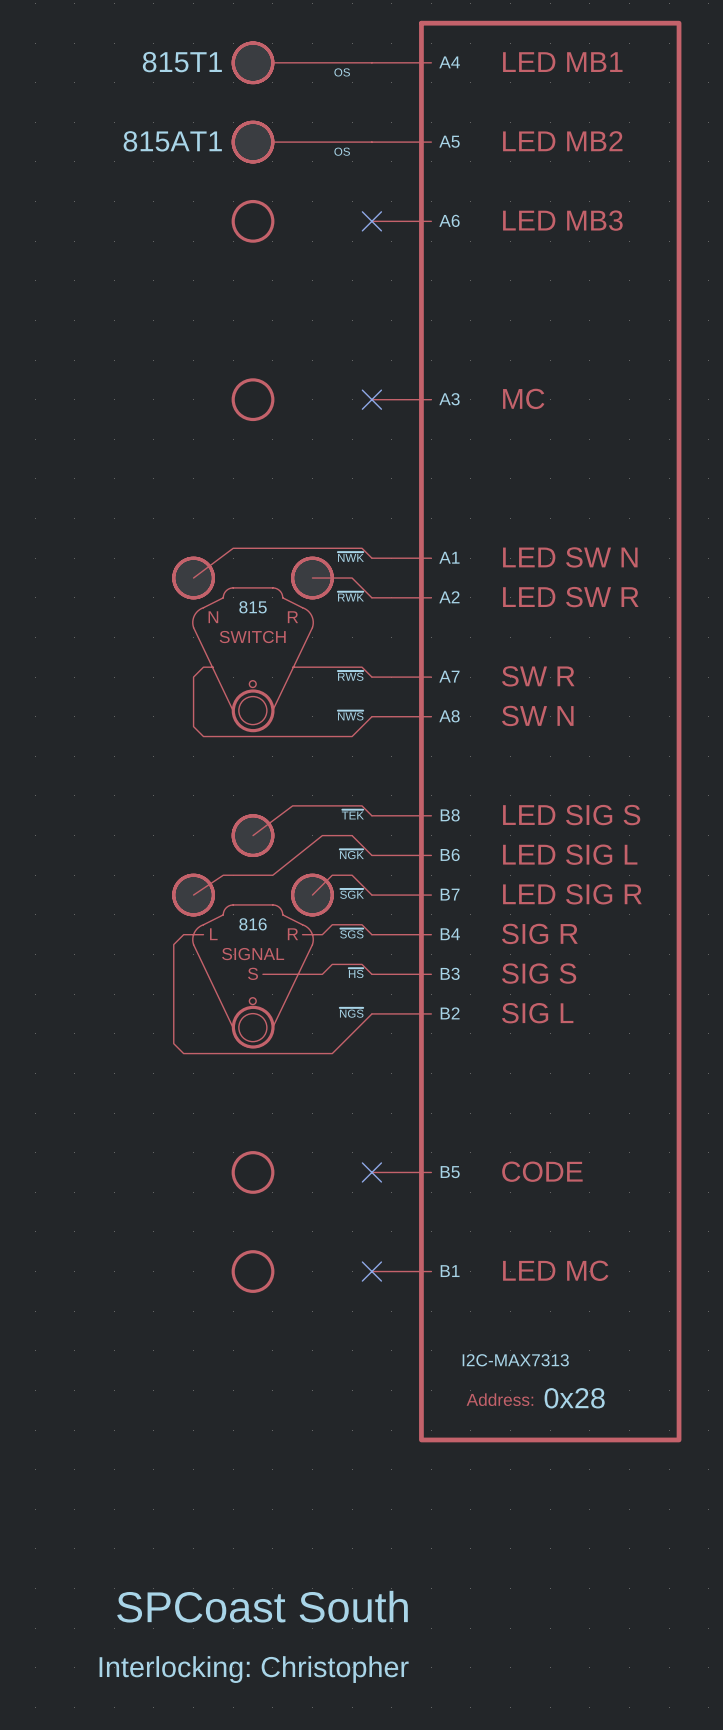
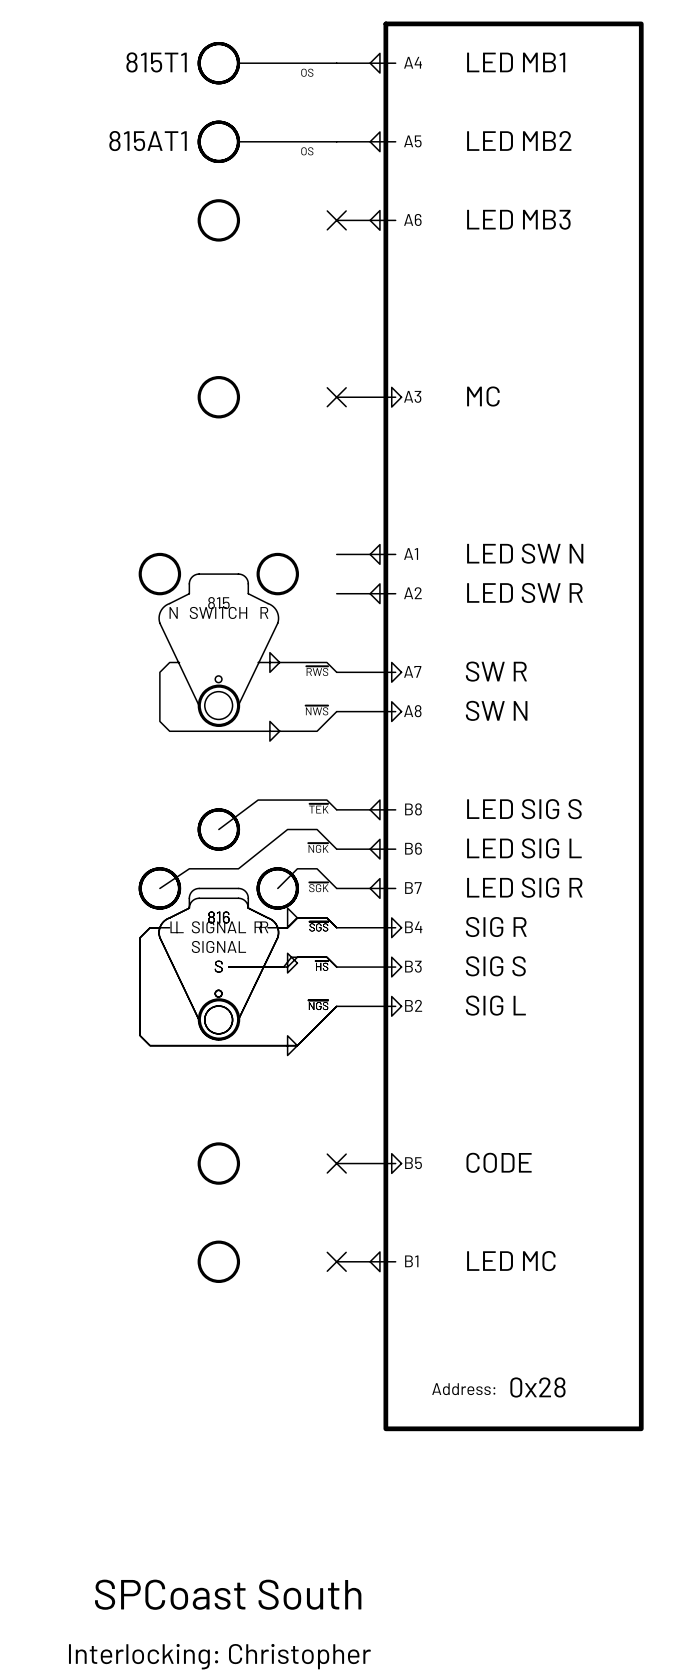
part symbol: [371, 20, 682, 1443] -> [336, 21, 644, 1432]
part: 815 (272, 642) -> none
part: none -> 815 (247, 657)
part: none -> 816 (238, 971)
part text: I2C-MAX7313 (515, 1360) -> none

